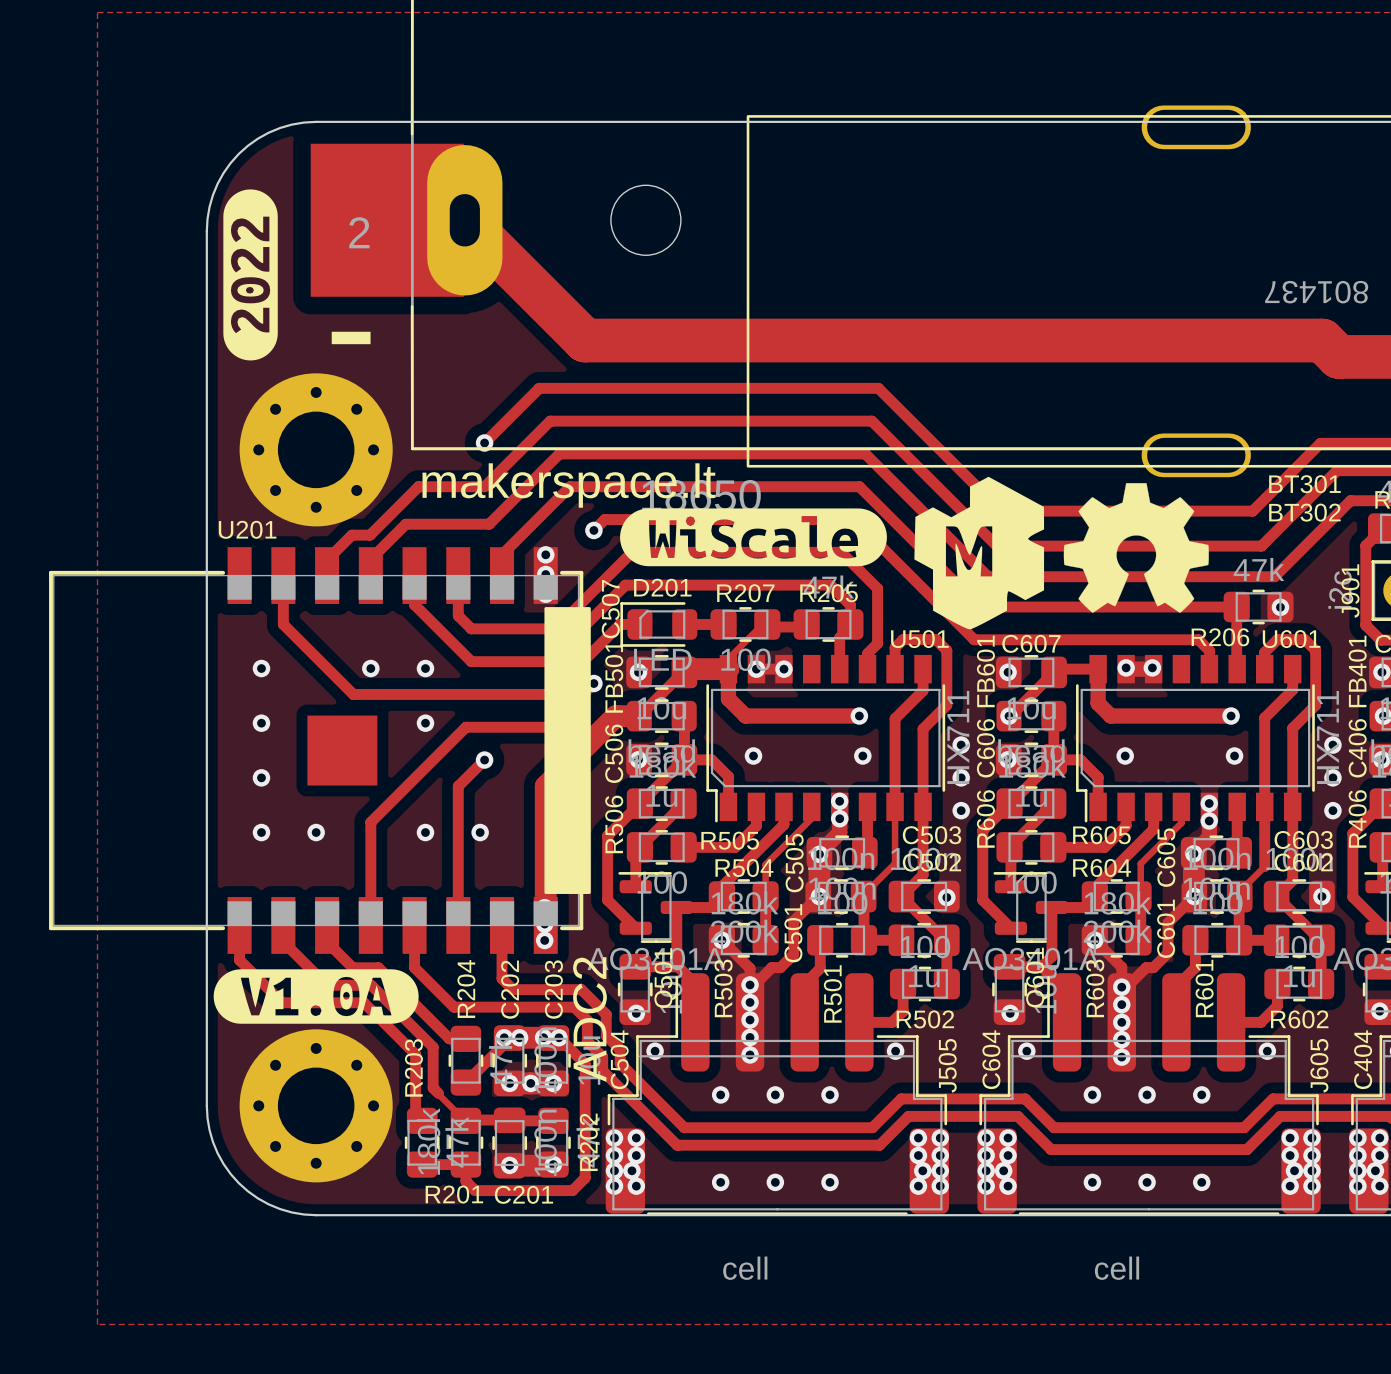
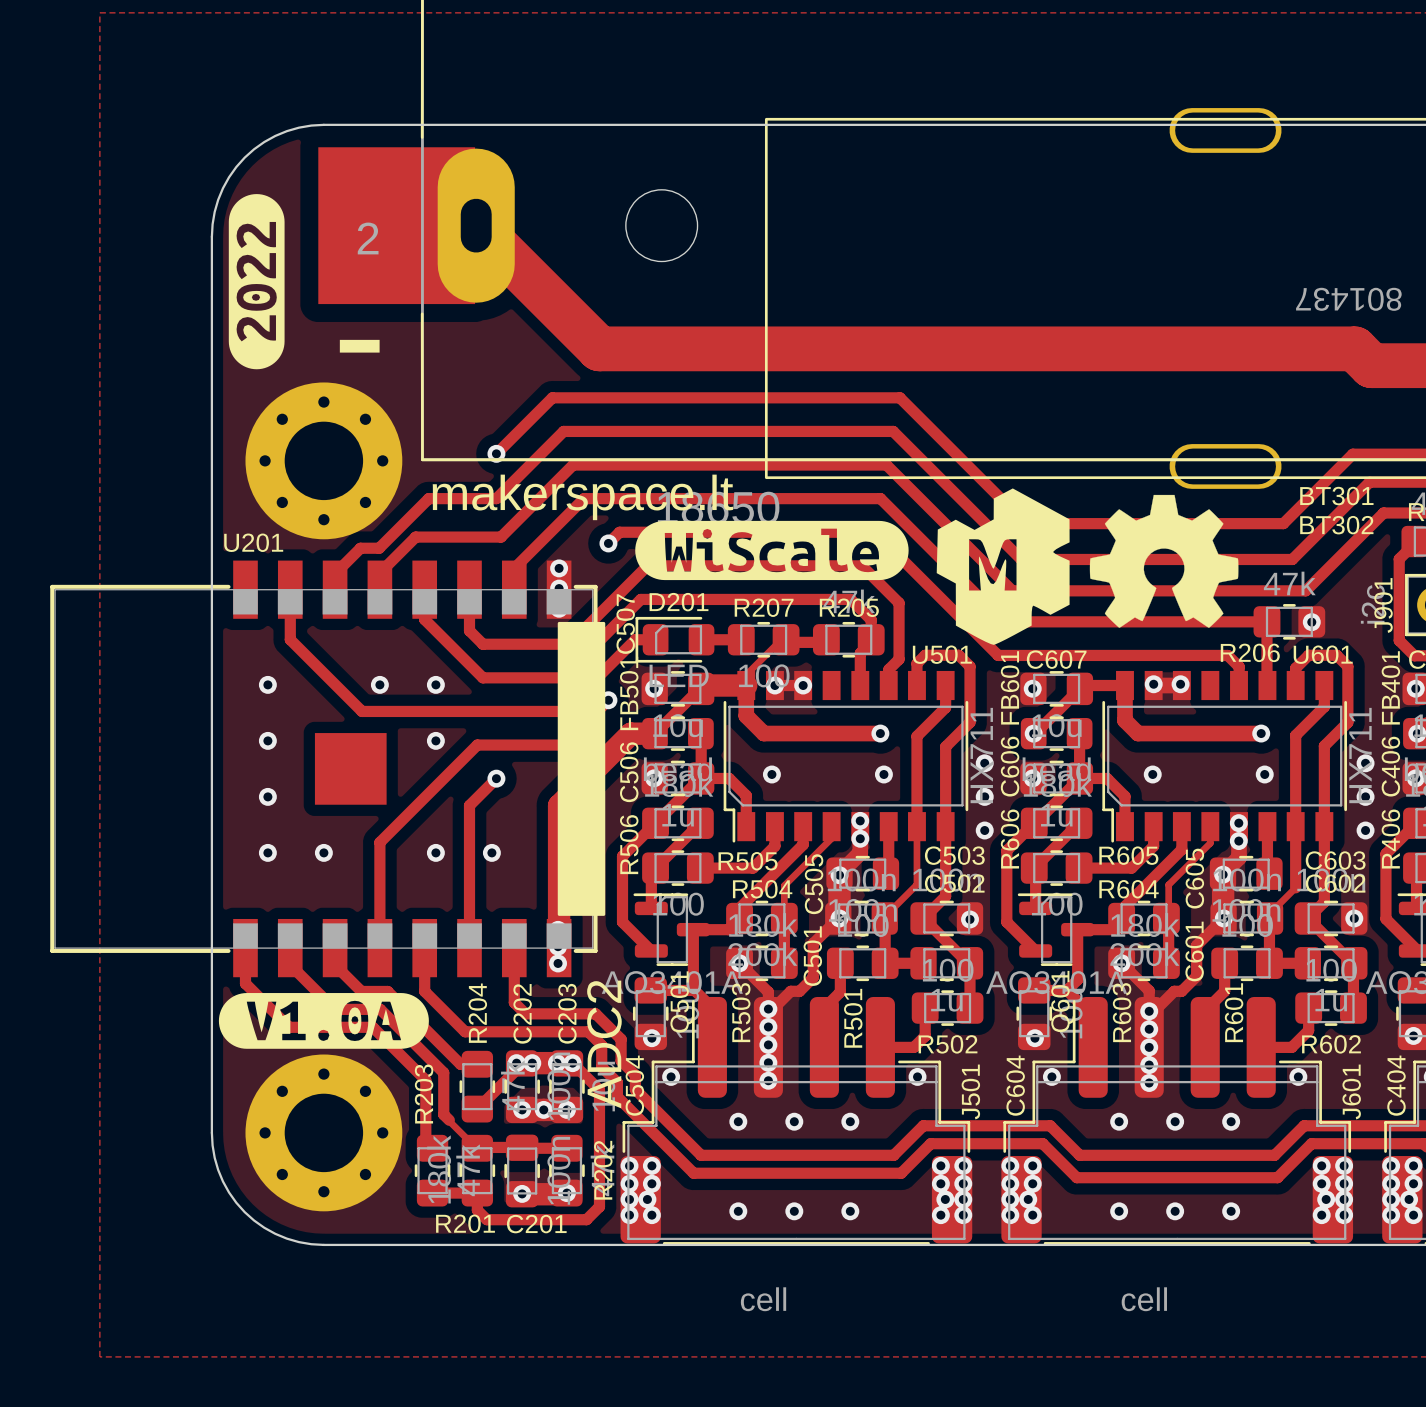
J505 name: J505 (947, 1065) -> J501 (970, 1091)
J605 name: J605 (1319, 1065) -> J601 (1351, 1091)

